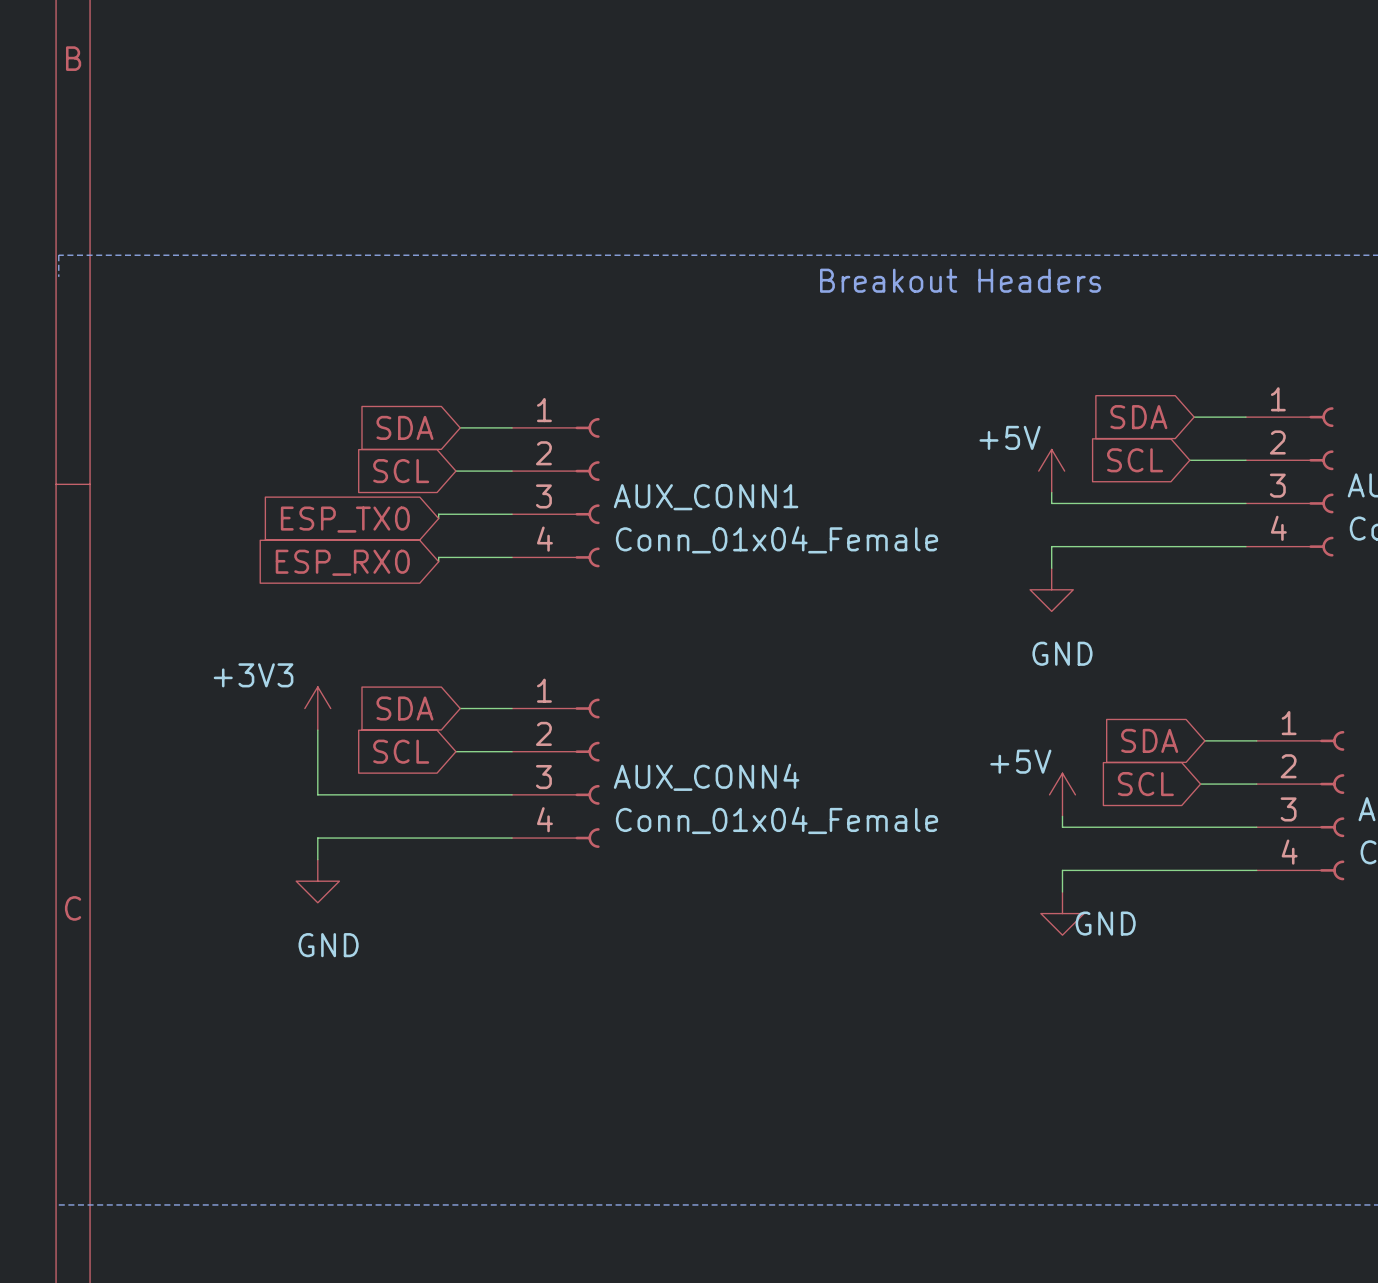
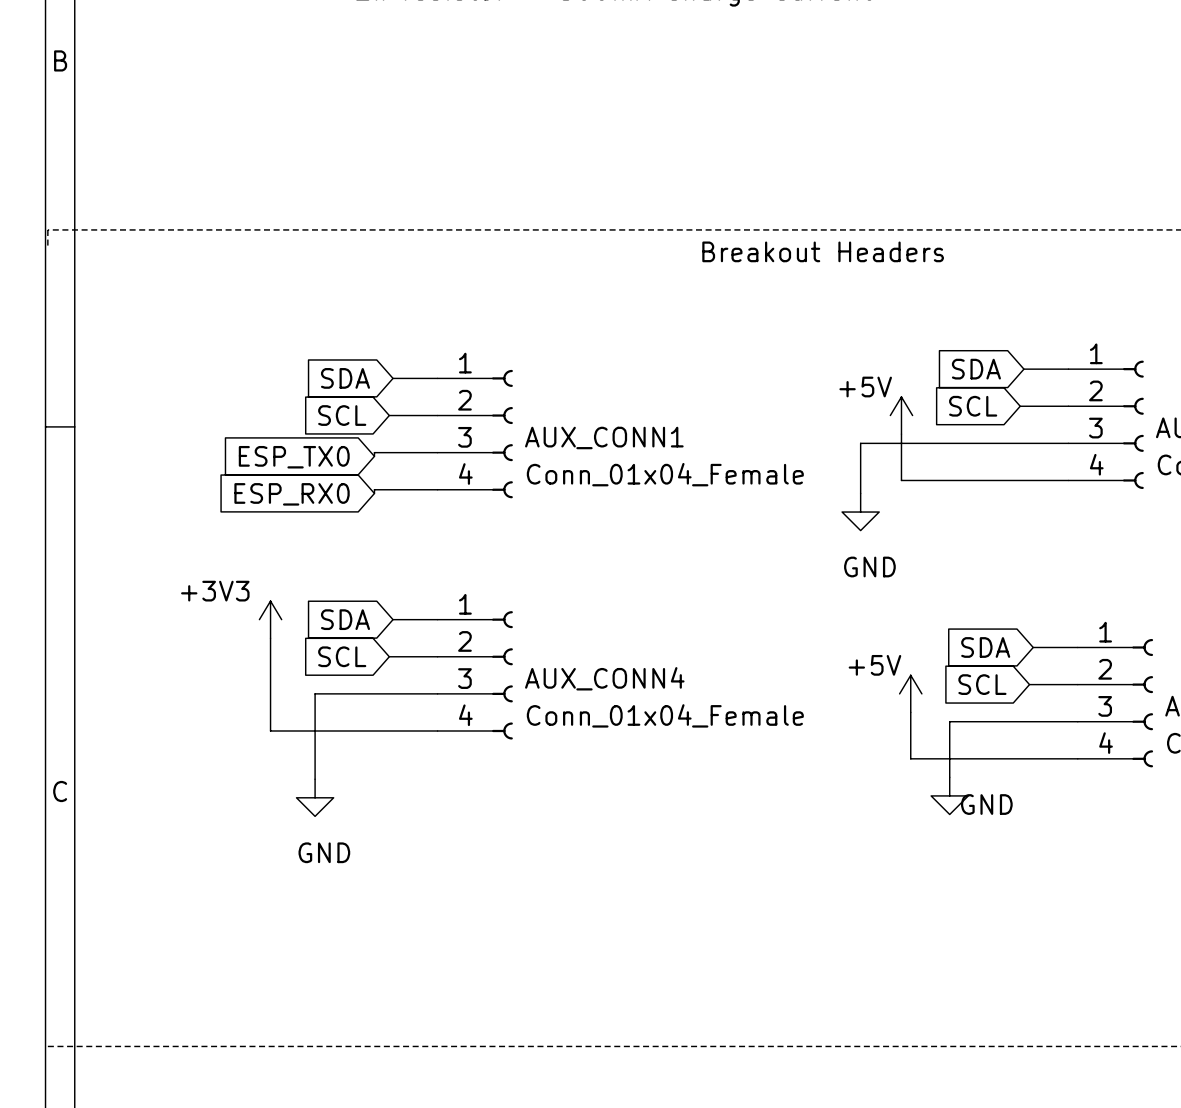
wire: (1051, 546) (1051, 568) -> (901, 480) (901, 443) (860, 443) (860, 493)
power symbol position: GND (1051, 589) -> GND (860, 512)
wire: (317, 794) (369, 794) -> (315, 779) (315, 693)
wire: (1062, 827) (1107, 827) -> (910, 721) (910, 758)
wire: none -> (949, 721) (949, 777)
wire: (317, 838) (317, 859) -> (270, 730) (270, 693)
wire: (1062, 870) (1062, 891) -> none
power symbol position: GND (317, 881) -> GND (315, 797)
power symbol position: GND (1062, 913) -> GND (949, 795)

